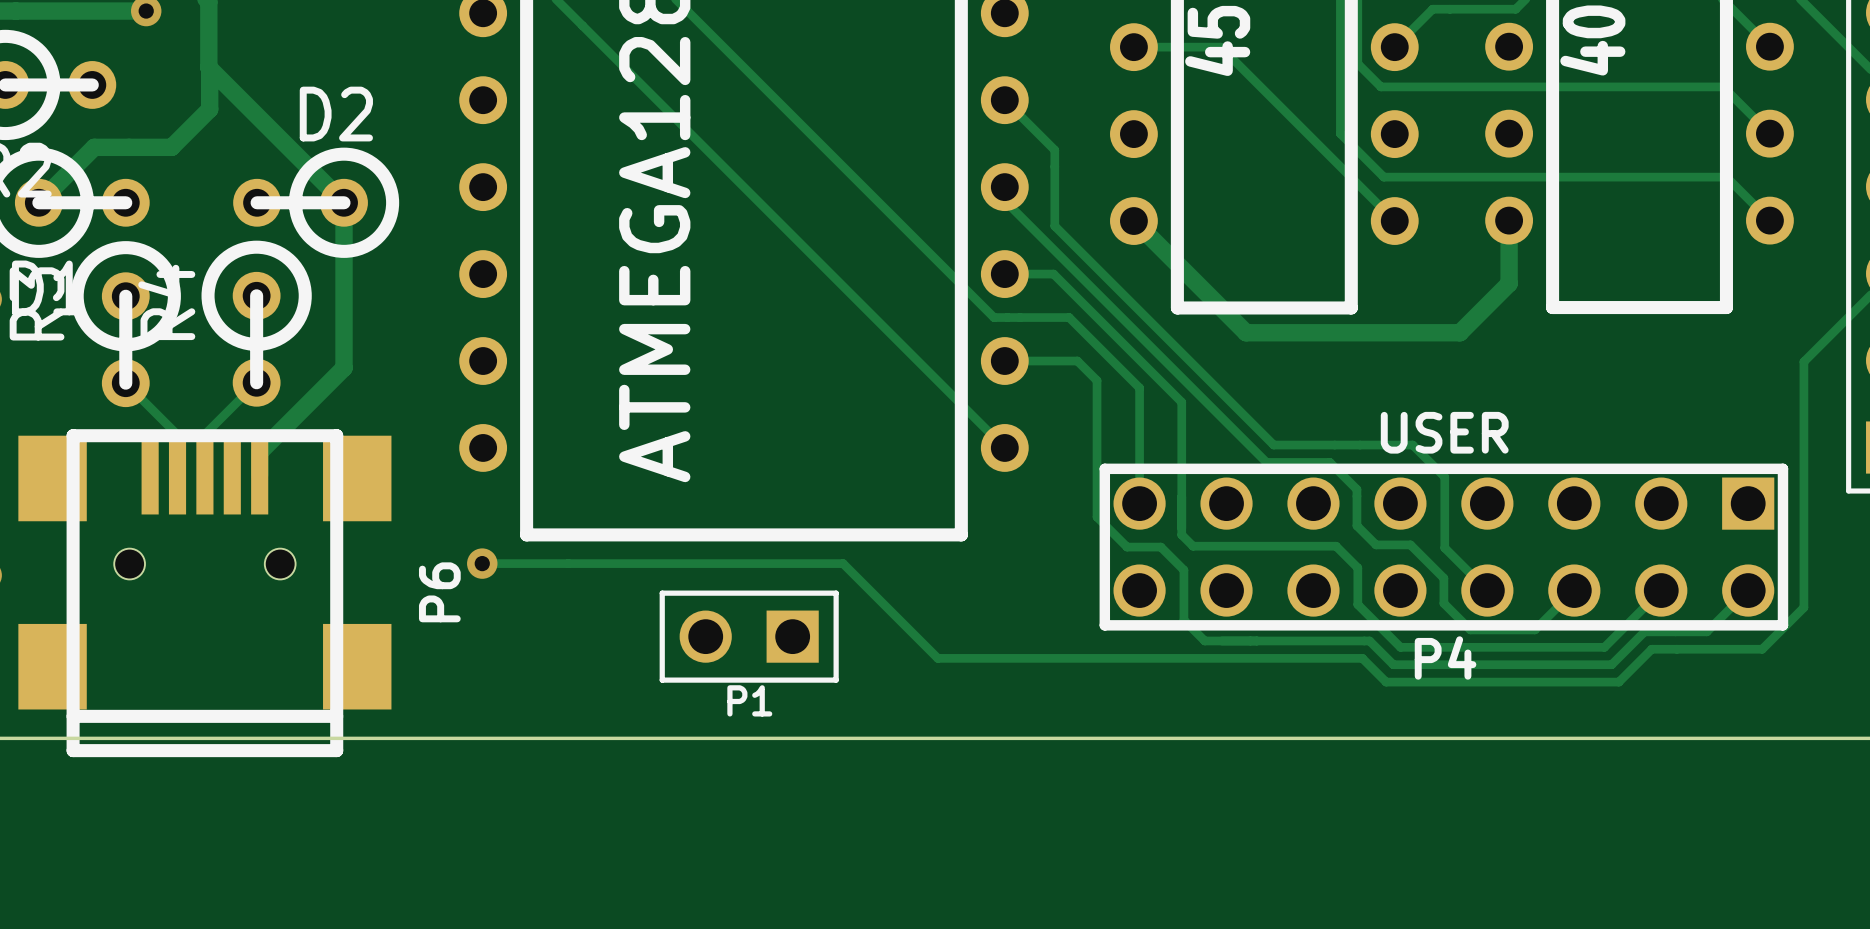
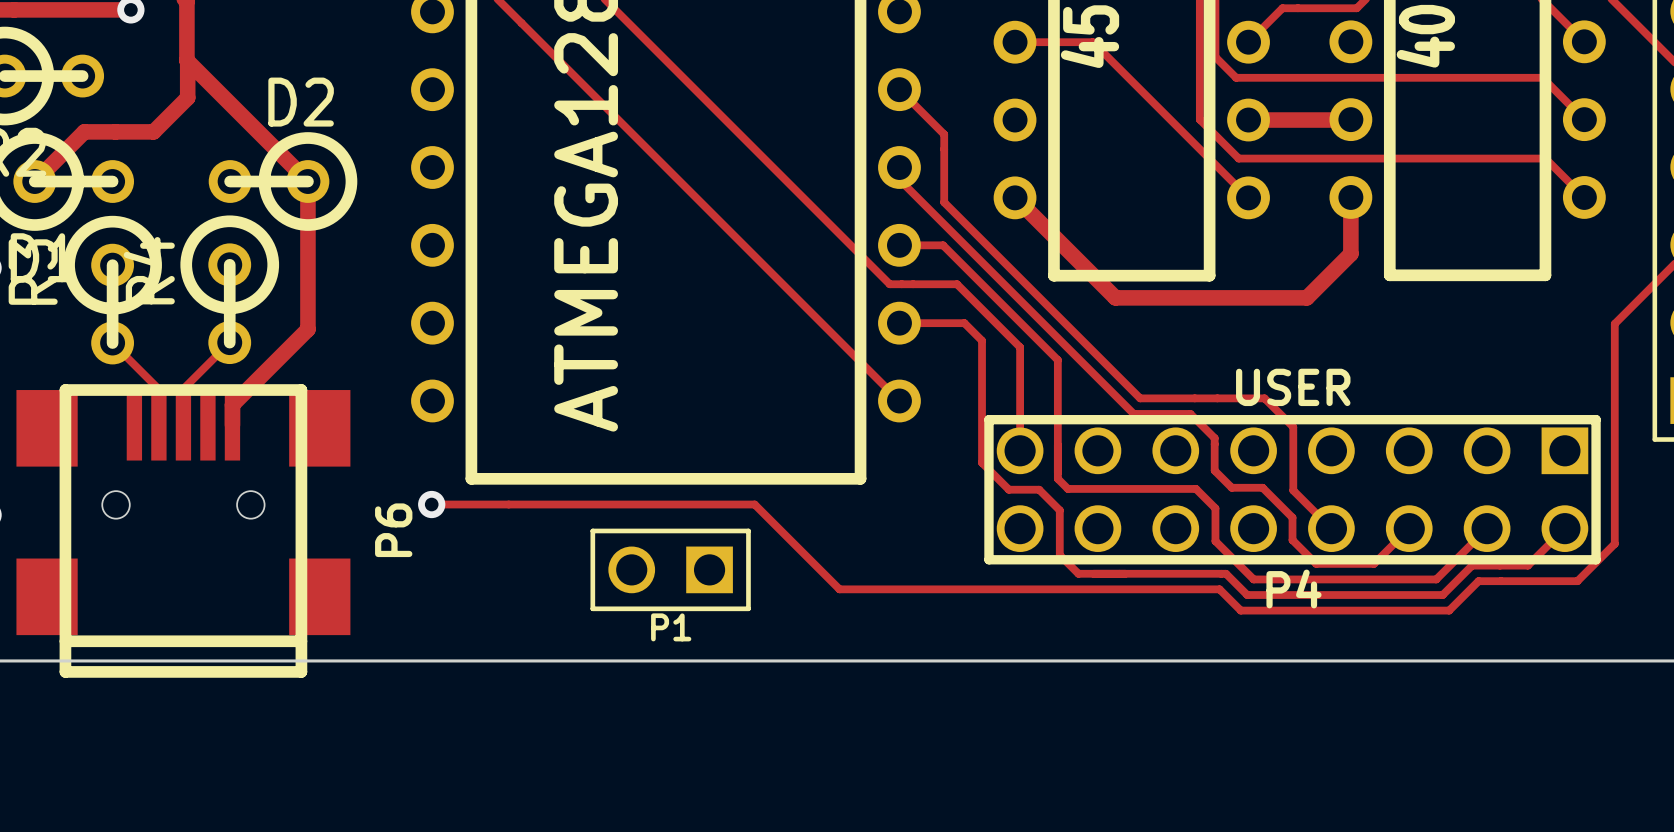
track: none -> (1248, 120) (1350, 120)

